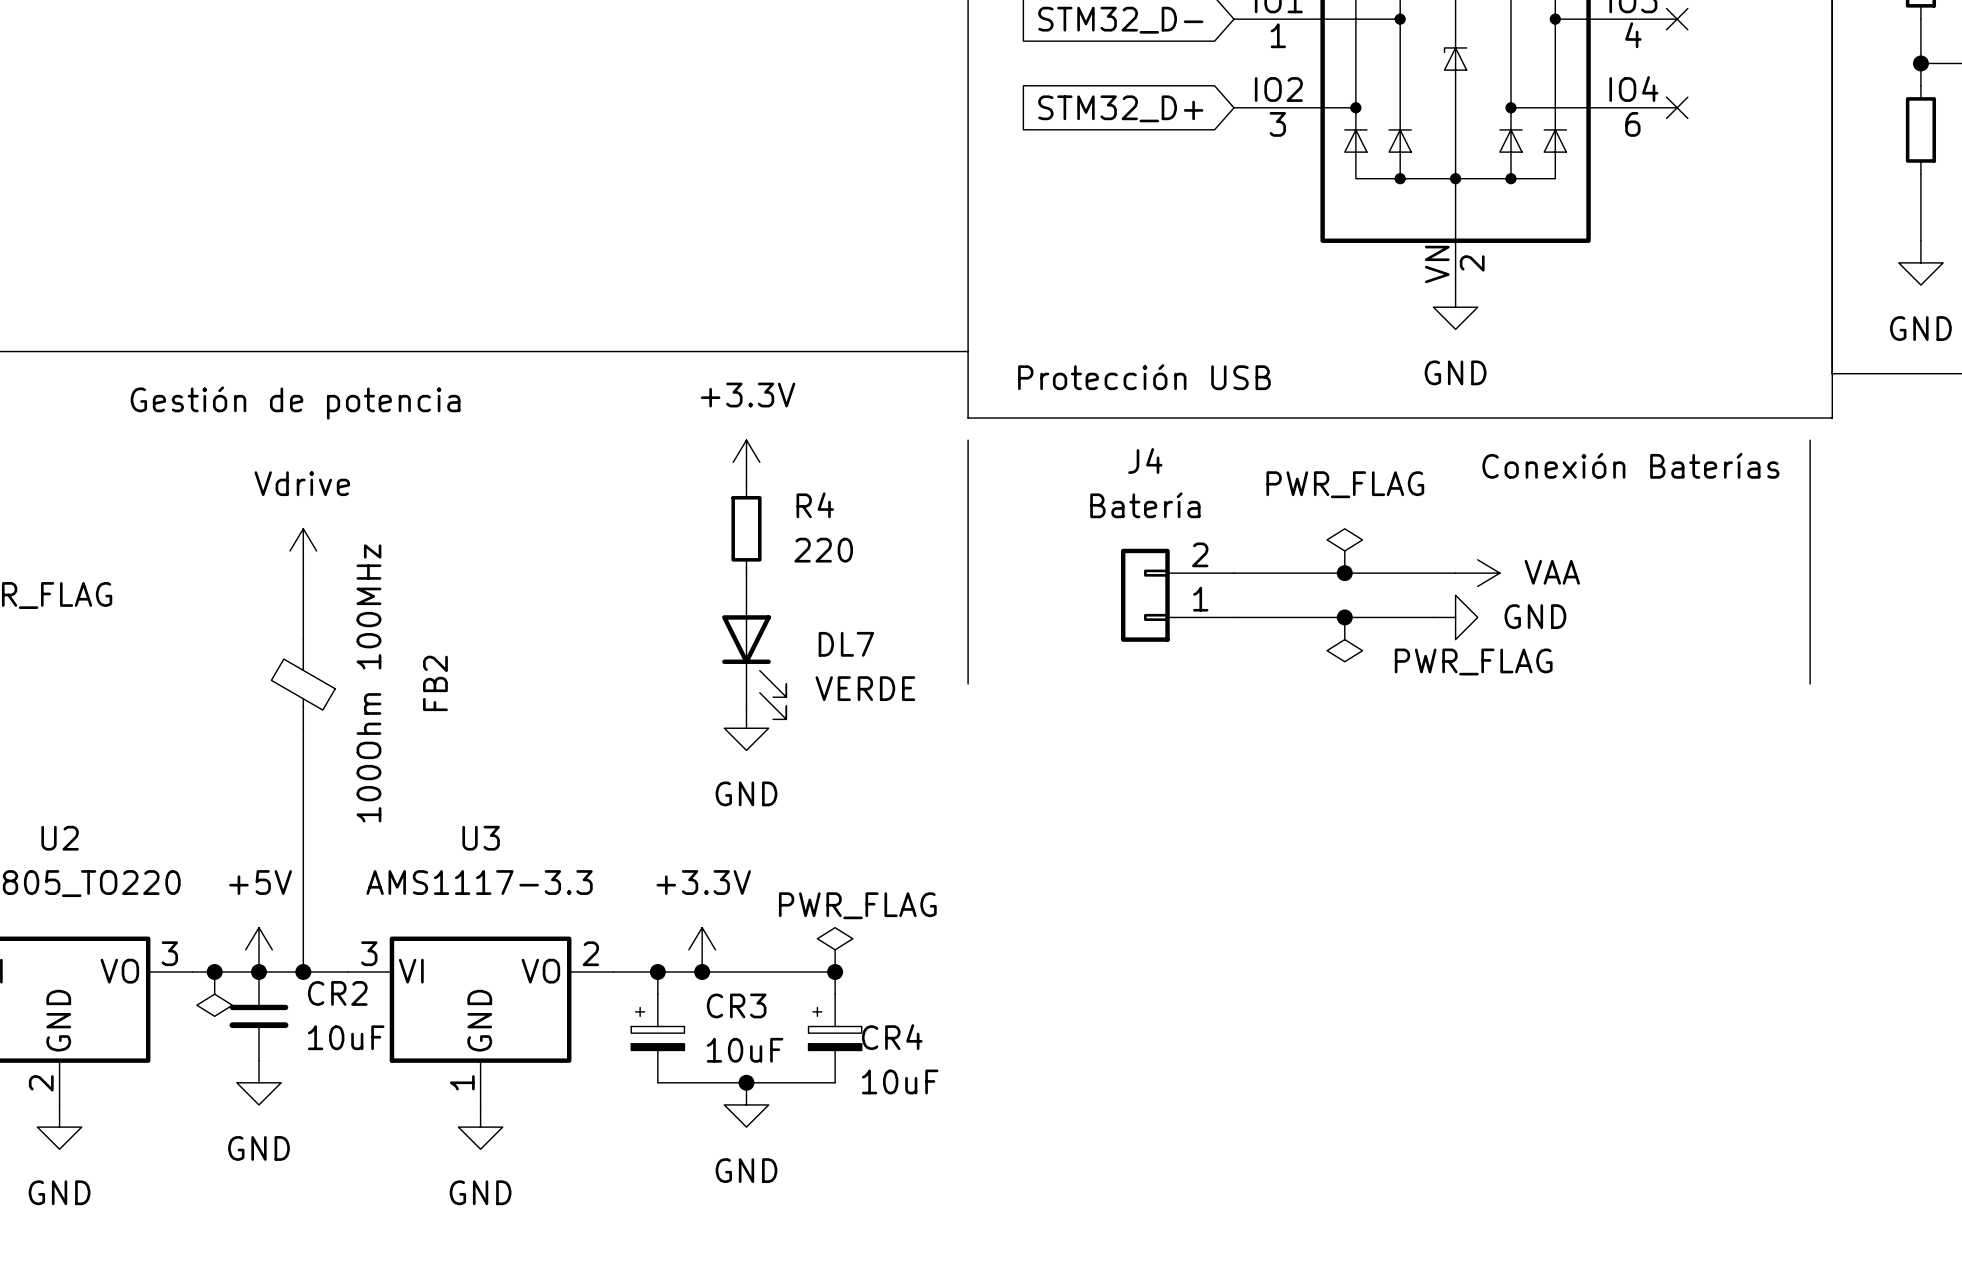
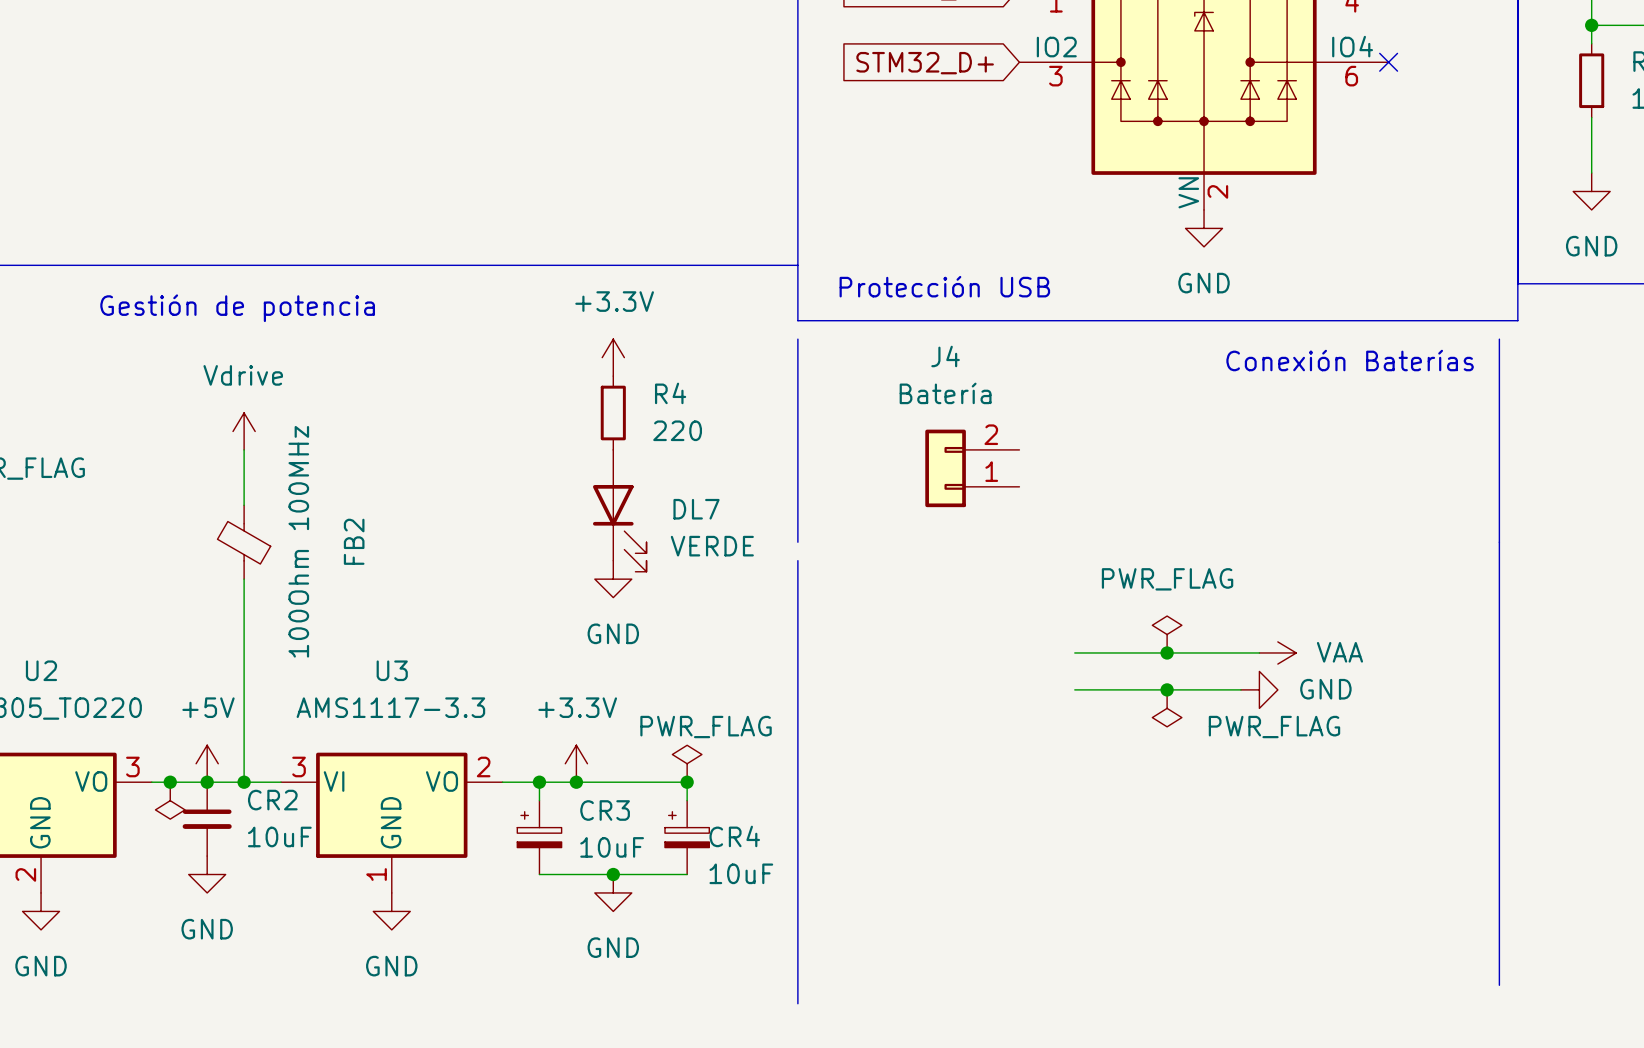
power symbol: PWR_FLAG (1344, 550) -> none
wire: (1234, 573) (1455, 573) -> (1074, 652) (1259, 652)
junction: (1344, 573) -> none
power symbol position: VAA (1477, 573) -> VAA (1277, 652)
wire: (1234, 617) (1433, 617) -> (1074, 689) (1240, 689)
junction: (1344, 617) -> none
power symbol position: GND (1455, 617) -> GND (1259, 689)
power symbol: PWR_FLAG (1344, 639) -> none
line: none -> (1499, 542) (1499, 985)
line: none -> (797, 560) (797, 1003)
power symbol: none -> PWR_FLAG (1167, 634)
junction: none -> (1167, 652)
junction: none -> (1167, 689)
power symbol: none -> PWR_FLAG (1167, 708)

